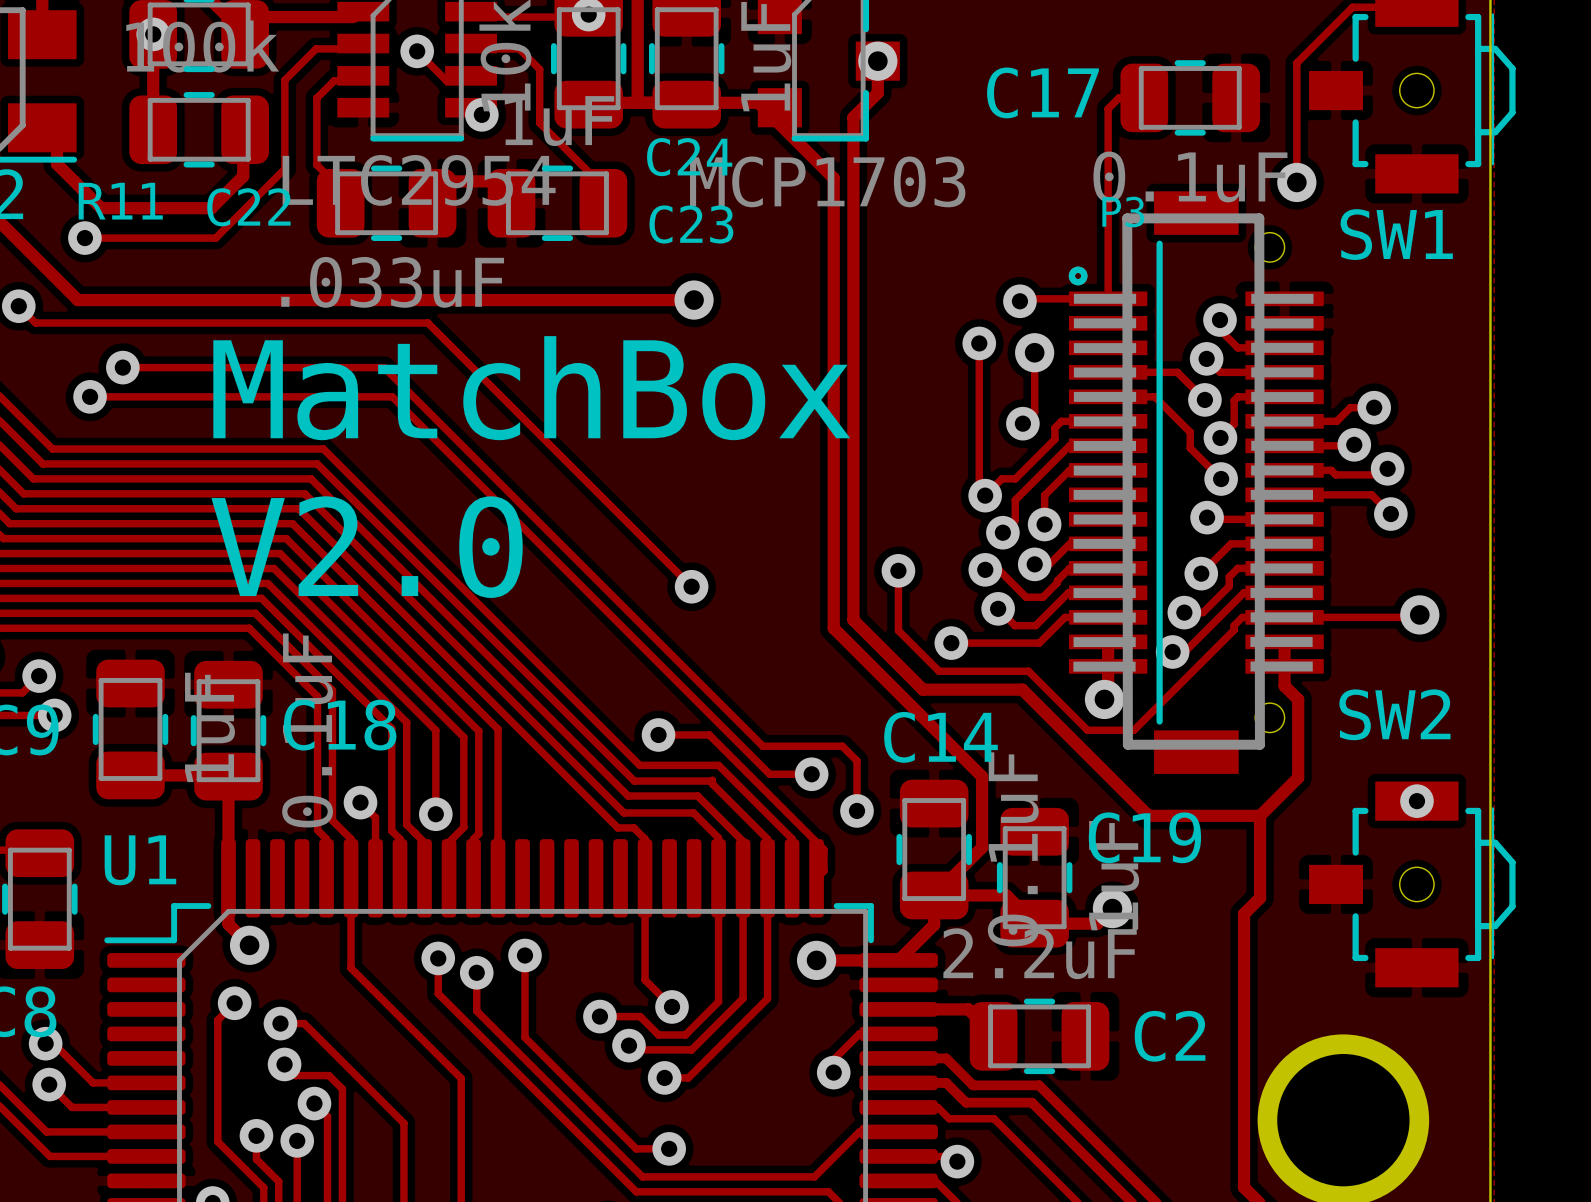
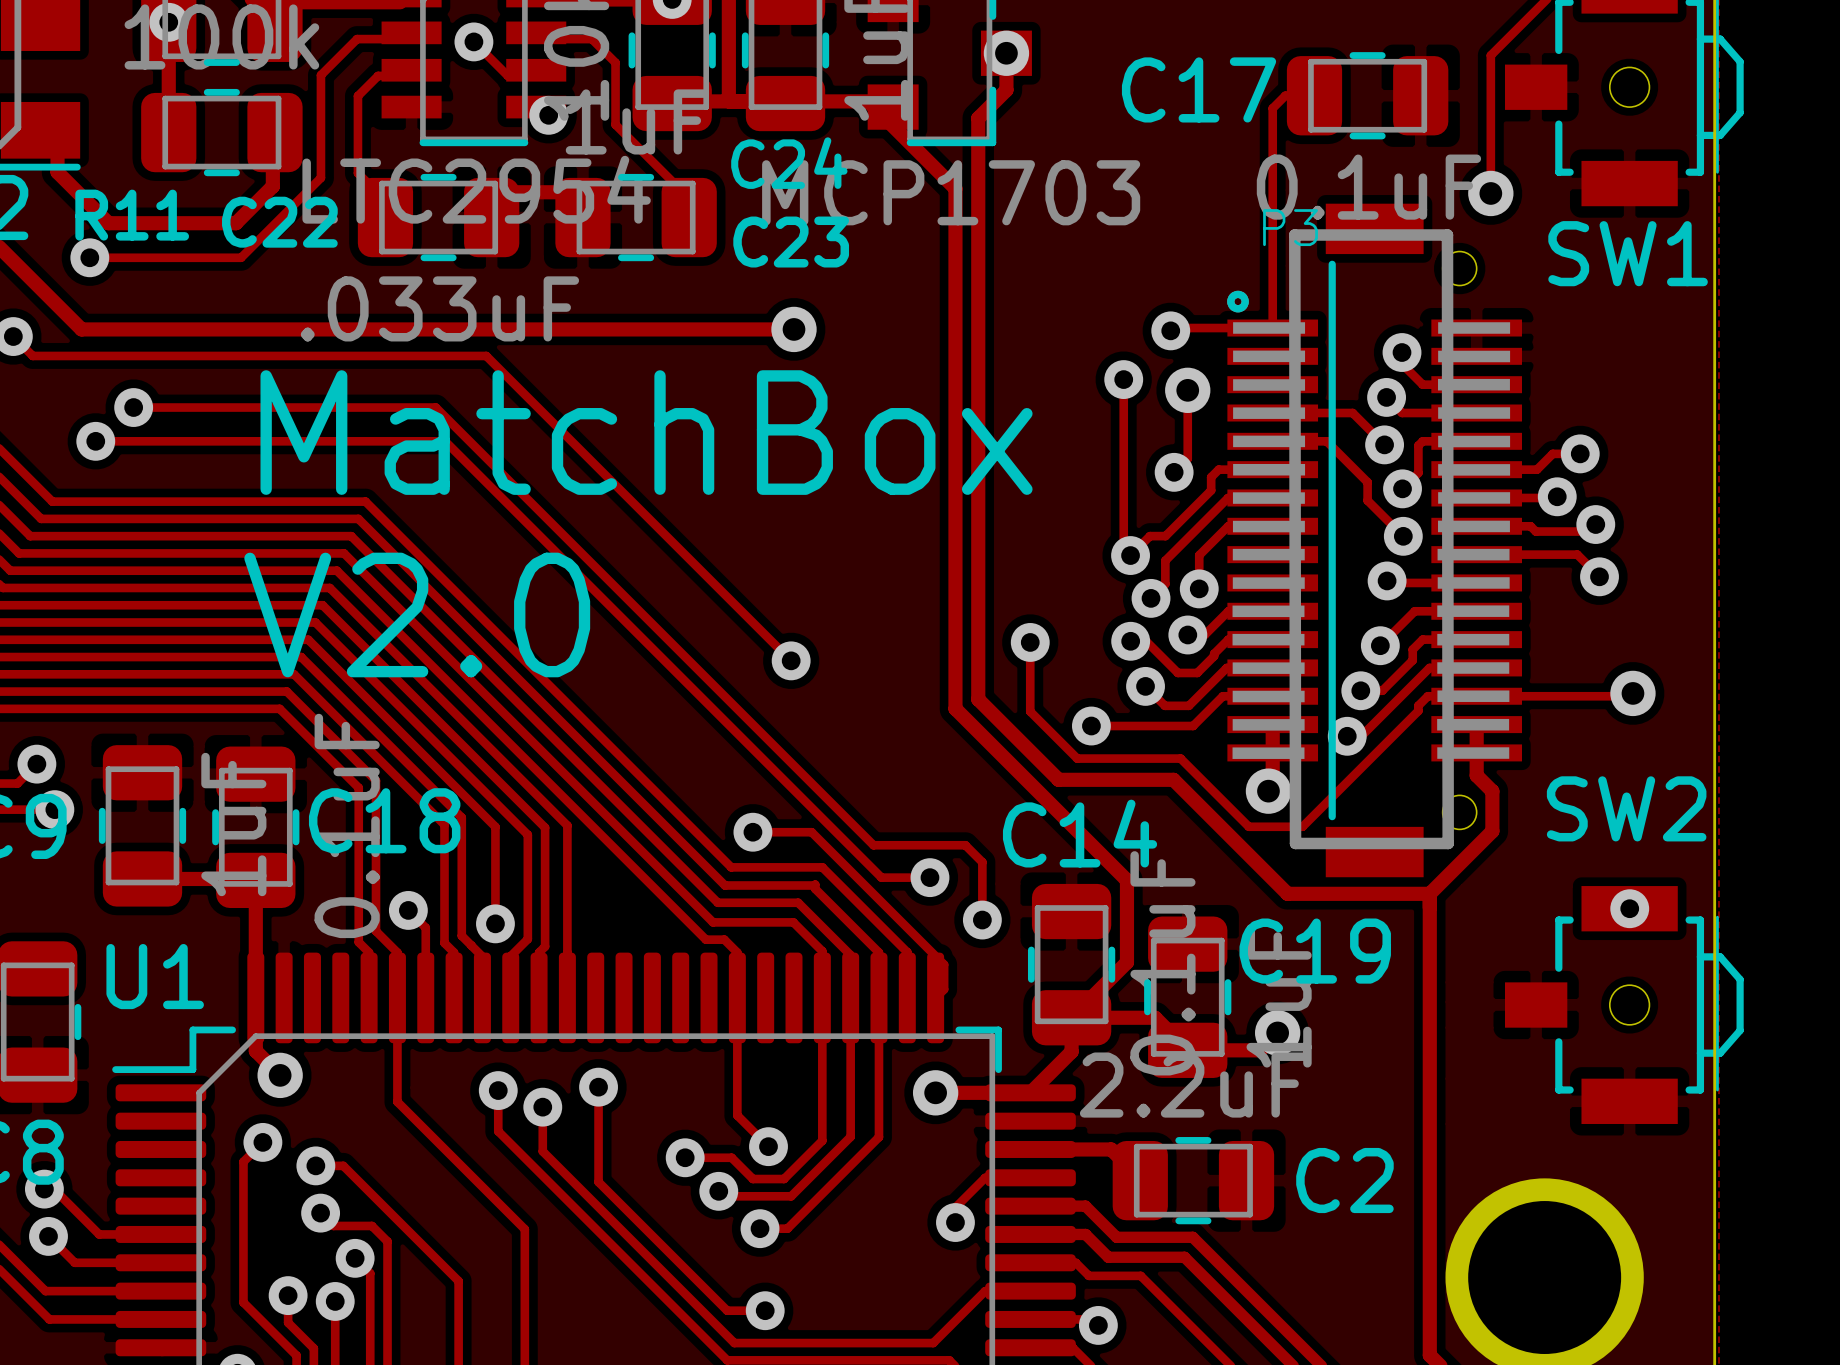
track: (1298, 734) (1298, 777) (1260, 815) -> (1492, 831) (1429, 893)
track: (1121, 788) (1148, 815) (1260, 815) -> (1287, 893) (1429, 893)
track: (1260, 815) (1260, 897) (1244, 913) -> (1429, 893) (1429, 1039)

